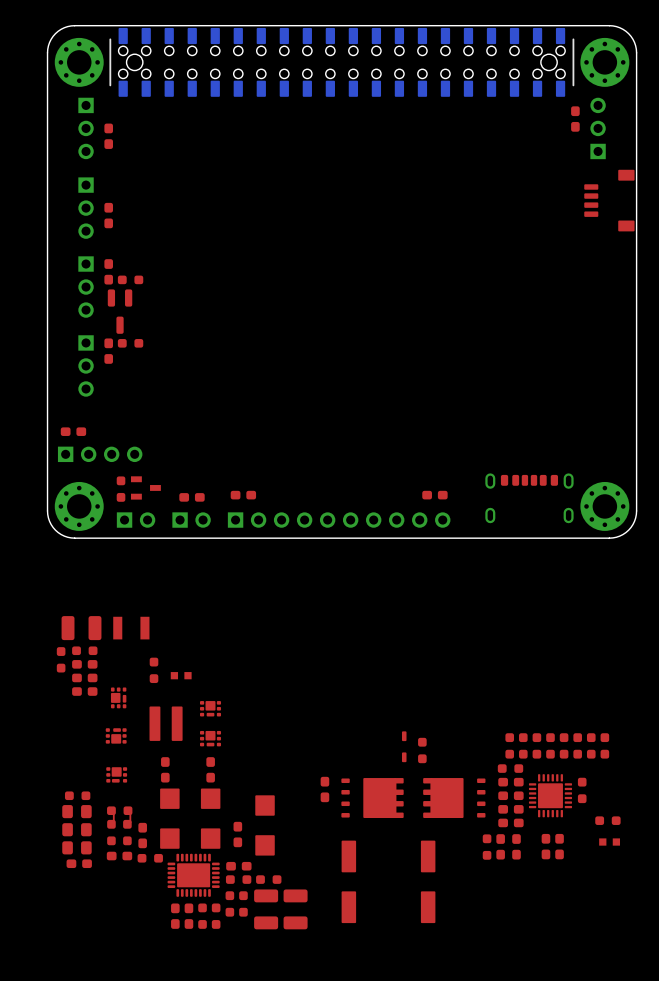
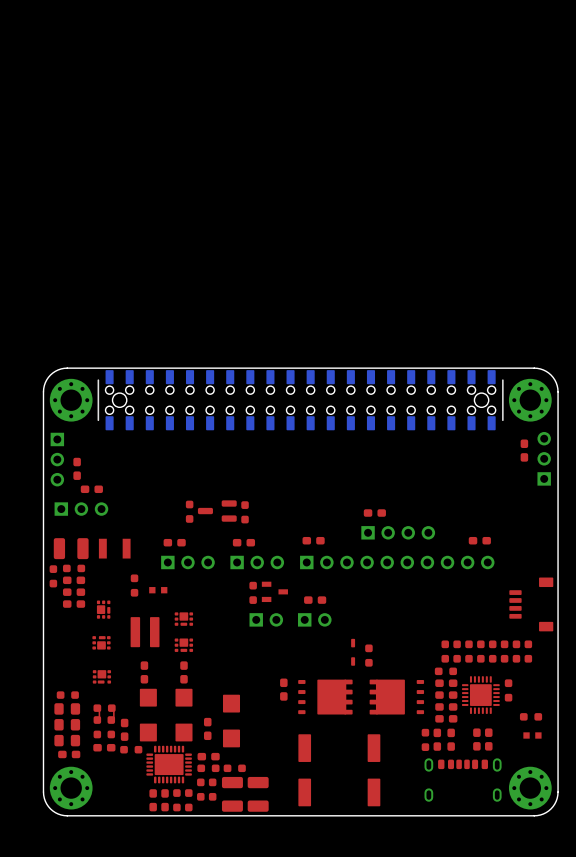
board edge: (609, 25) (74, 25) (64, 27) (55, 33) (49, 42) (47, 52) (47, 510) (49, 521) (55, 530) (64, 536) (74, 538) (609, 538) (619, 536) (628, 530) (634, 521) (636, 510) (636, 52) (634, 42) (628, 33) (619, 27) (609, 25) -> none
part: (79, 62) -> none
part: (341, 62) -> none
part: (604, 62) -> none
part: (575, 119) -> none
part: (86, 128) -> none
part: (598, 128) -> none
part: (108, 136) -> none
part: (609, 200) -> none
part: (86, 208) -> none
part: (108, 215) -> none
part: (108, 271) -> none
part: (130, 279) -> none
part: (86, 287) -> none
part: (120, 311) -> none
part: (130, 343) -> none
part: (108, 351) -> none
part: (86, 365) -> none
board edge: none -> (534, 368) (67, 368) (58, 369) (50, 375) (45, 382) (43, 391) (43, 792) (45, 801) (50, 808) (58, 814) (67, 815) (534, 815) (543, 814) (551, 808) (556, 801) (558, 792) (558, 391) (556, 382) (551, 375) (543, 369) (534, 368)
part: (73, 431) -> none
part: (100, 454) -> none
part: none -> (300, 400)
part: (145, 487) -> none
part: (121, 489) -> none
part: (243, 495) -> none
part: (434, 495) -> none
part: (192, 497) -> none
part: (529, 498) -> none
part position: (79, 506) -> (71, 400)
part position: (604, 506) -> (530, 400)
part: none -> (524, 450)
part: (136, 520) -> none
part: (191, 520) -> none
part position: (339, 520) -> (397, 562)
part: none -> (544, 458)
part: none -> (57, 459)
part: none -> (77, 468)
part: none -> (91, 489)
part: none -> (81, 509)
part: none -> (189, 511)
part: none -> (217, 511)
part: none -> (245, 512)
part: none -> (374, 513)
part: none -> (398, 532)
part: none -> (313, 540)
part: none -> (479, 540)
part: none -> (174, 542)
part: none -> (243, 542)
part: none -> (187, 562)
part: none -> (257, 562)
part: none -> (274, 591)
part: none -> (253, 592)
part: none -> (315, 600)
part: none -> (531, 604)
part: none -> (266, 619)
part: none -> (314, 619)
part: none -> (463, 780)
part: none -> (71, 788)
part: none -> (530, 788)

